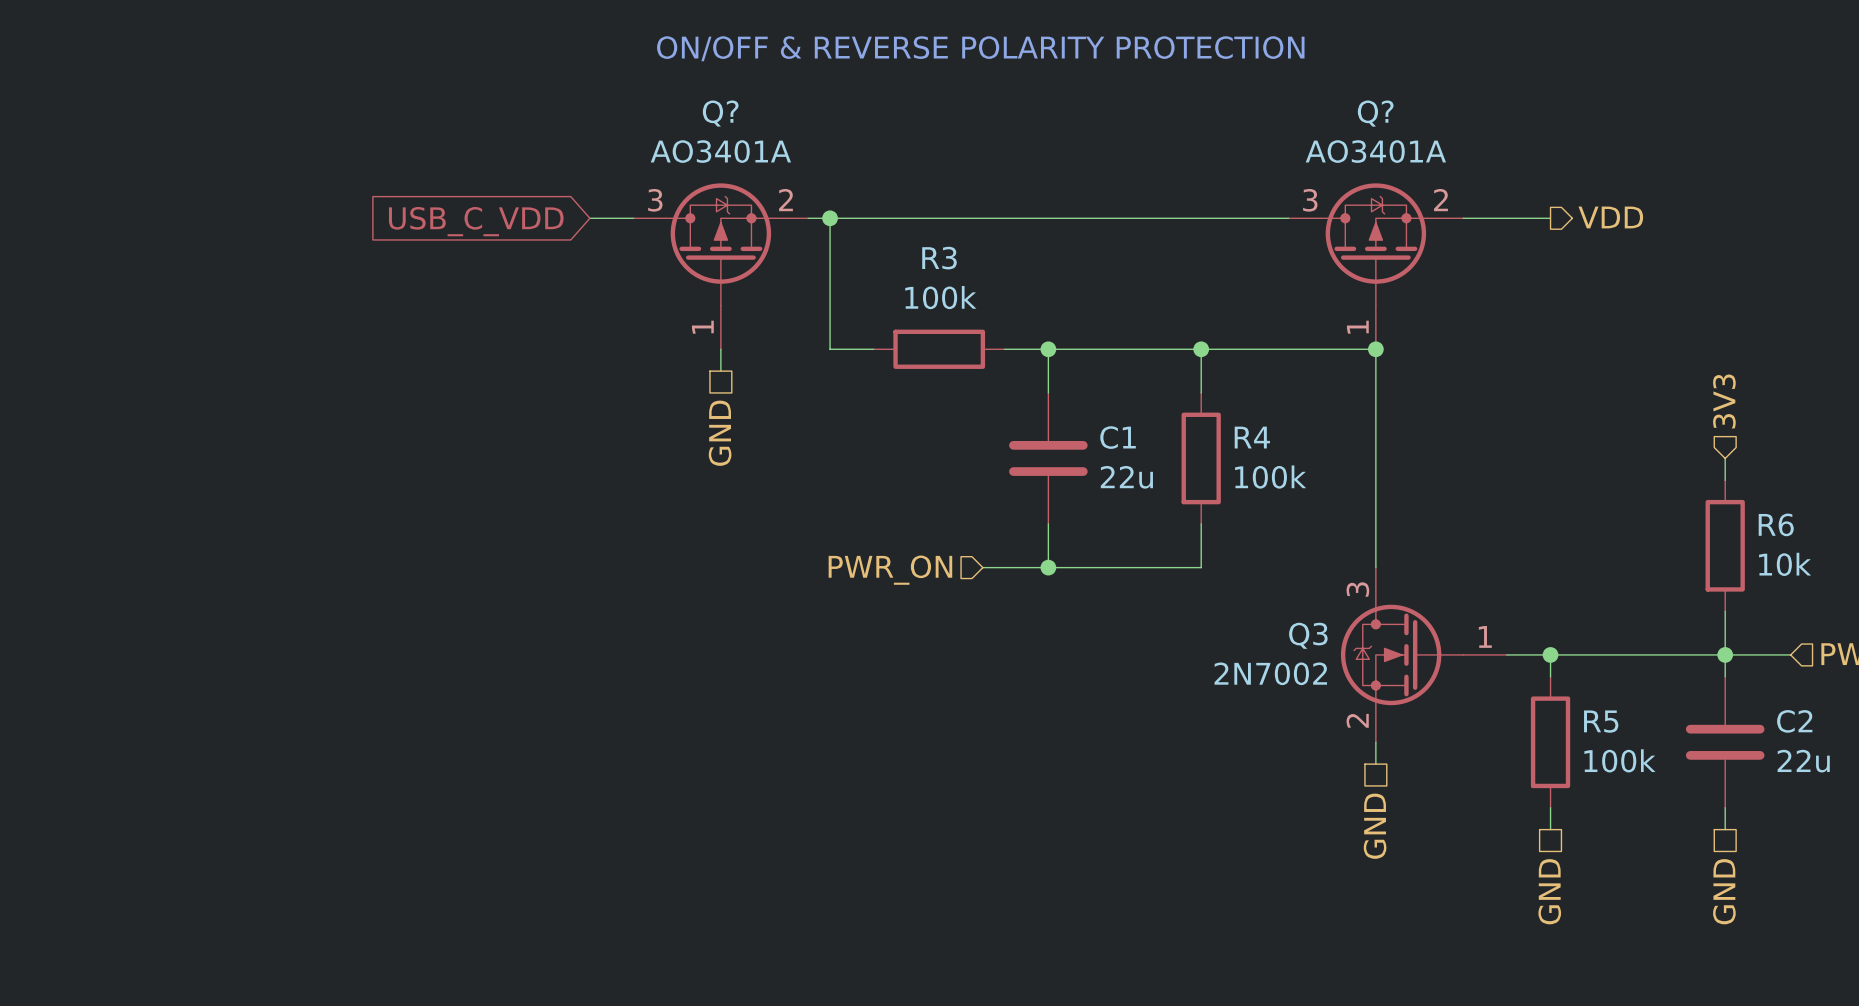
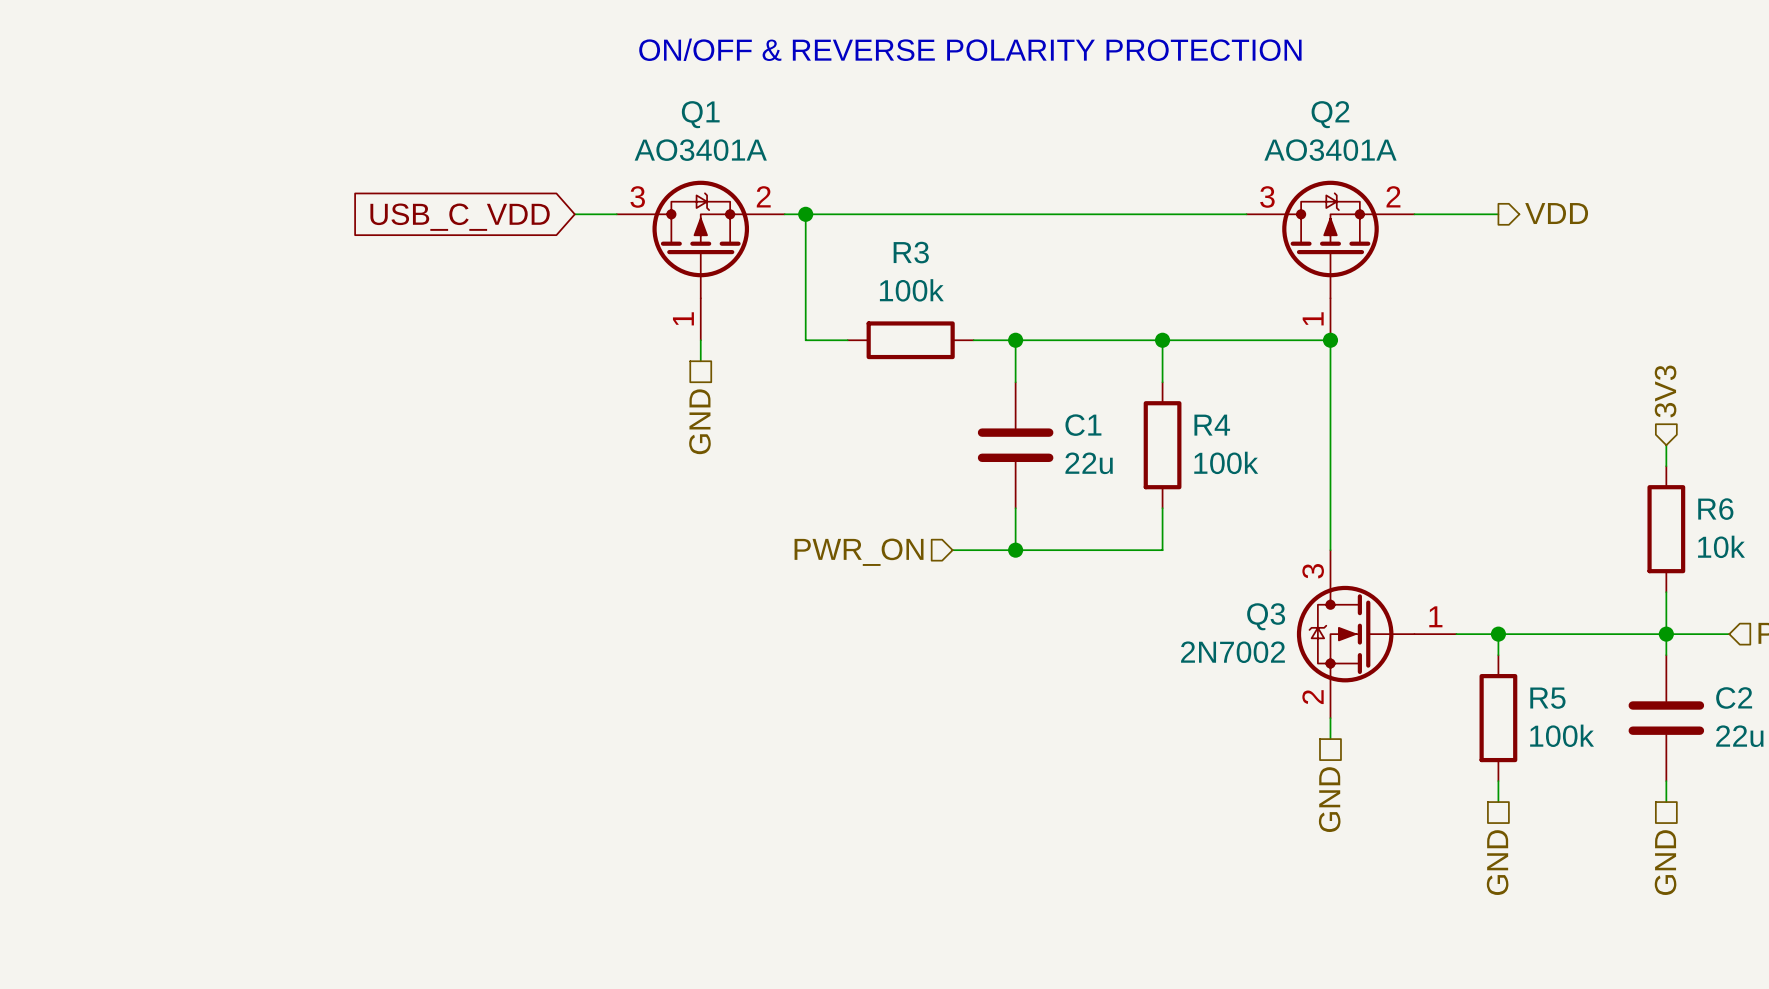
Q? name: Q? (720, 113) -> Q1 (700, 114)
Q? name: Q? (1375, 113) -> Q2 (1330, 114)

